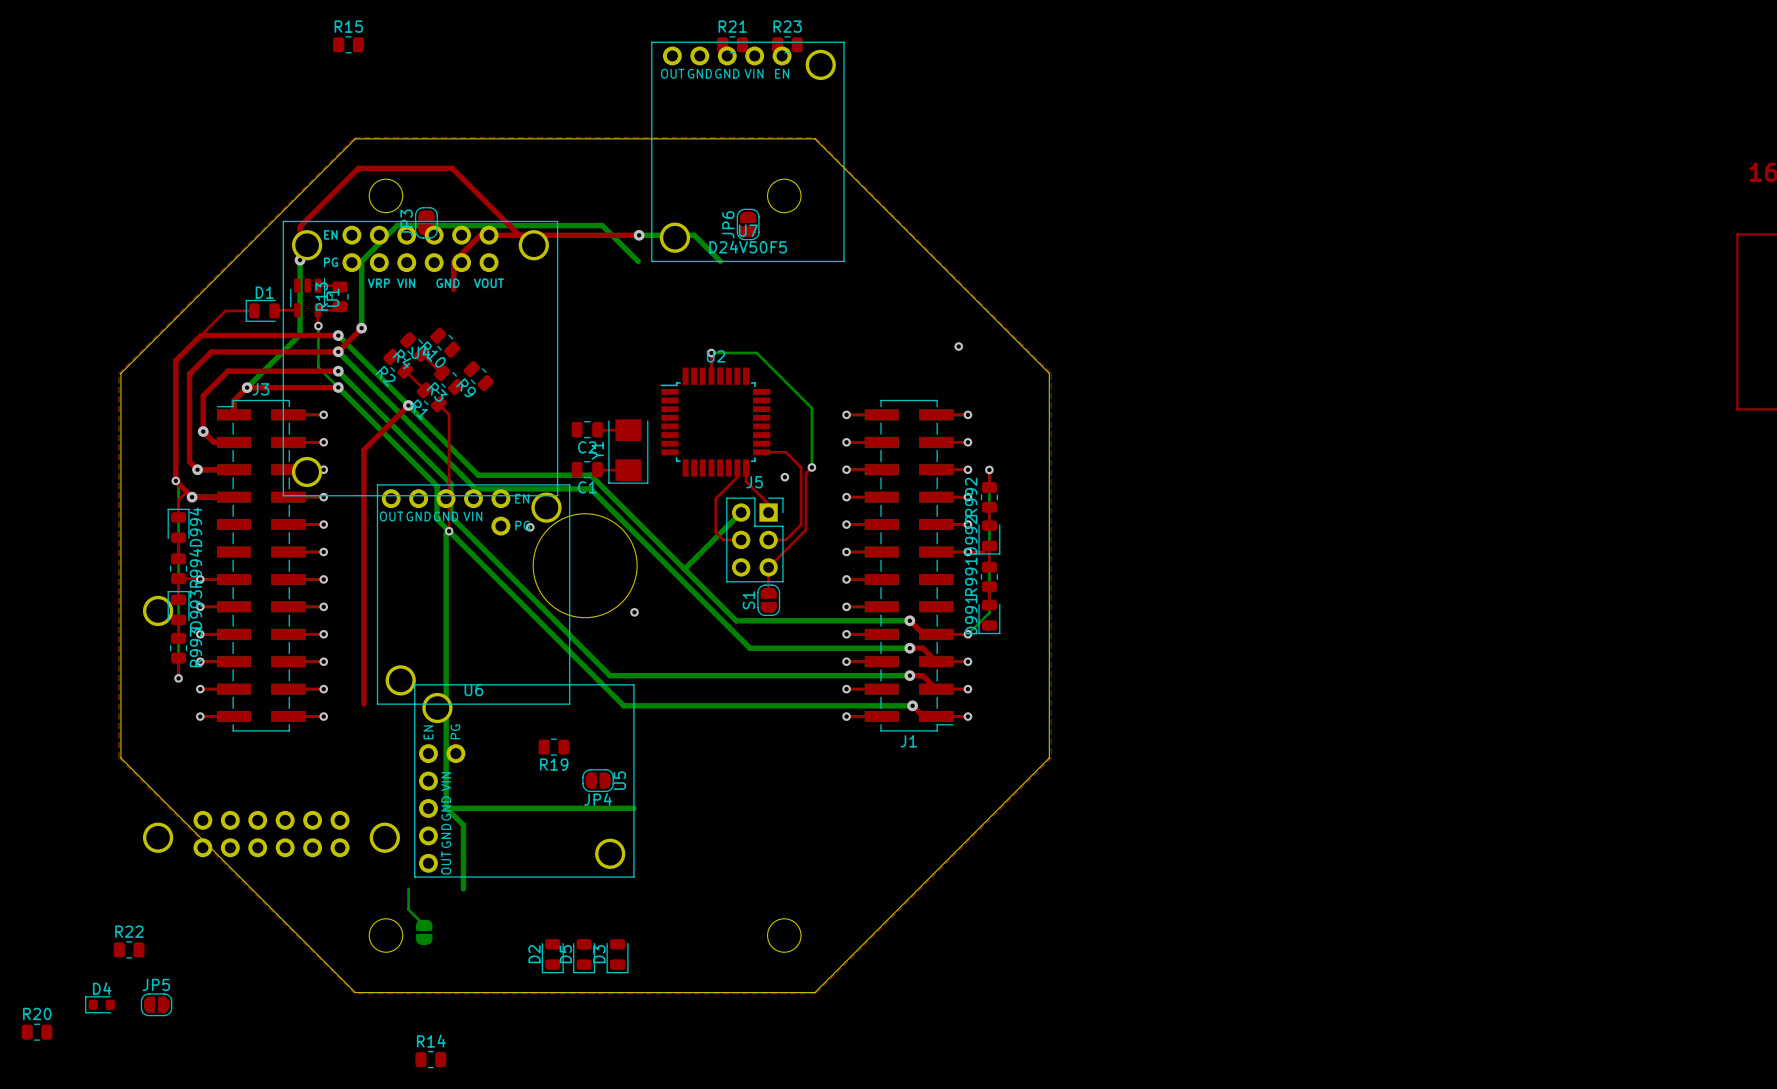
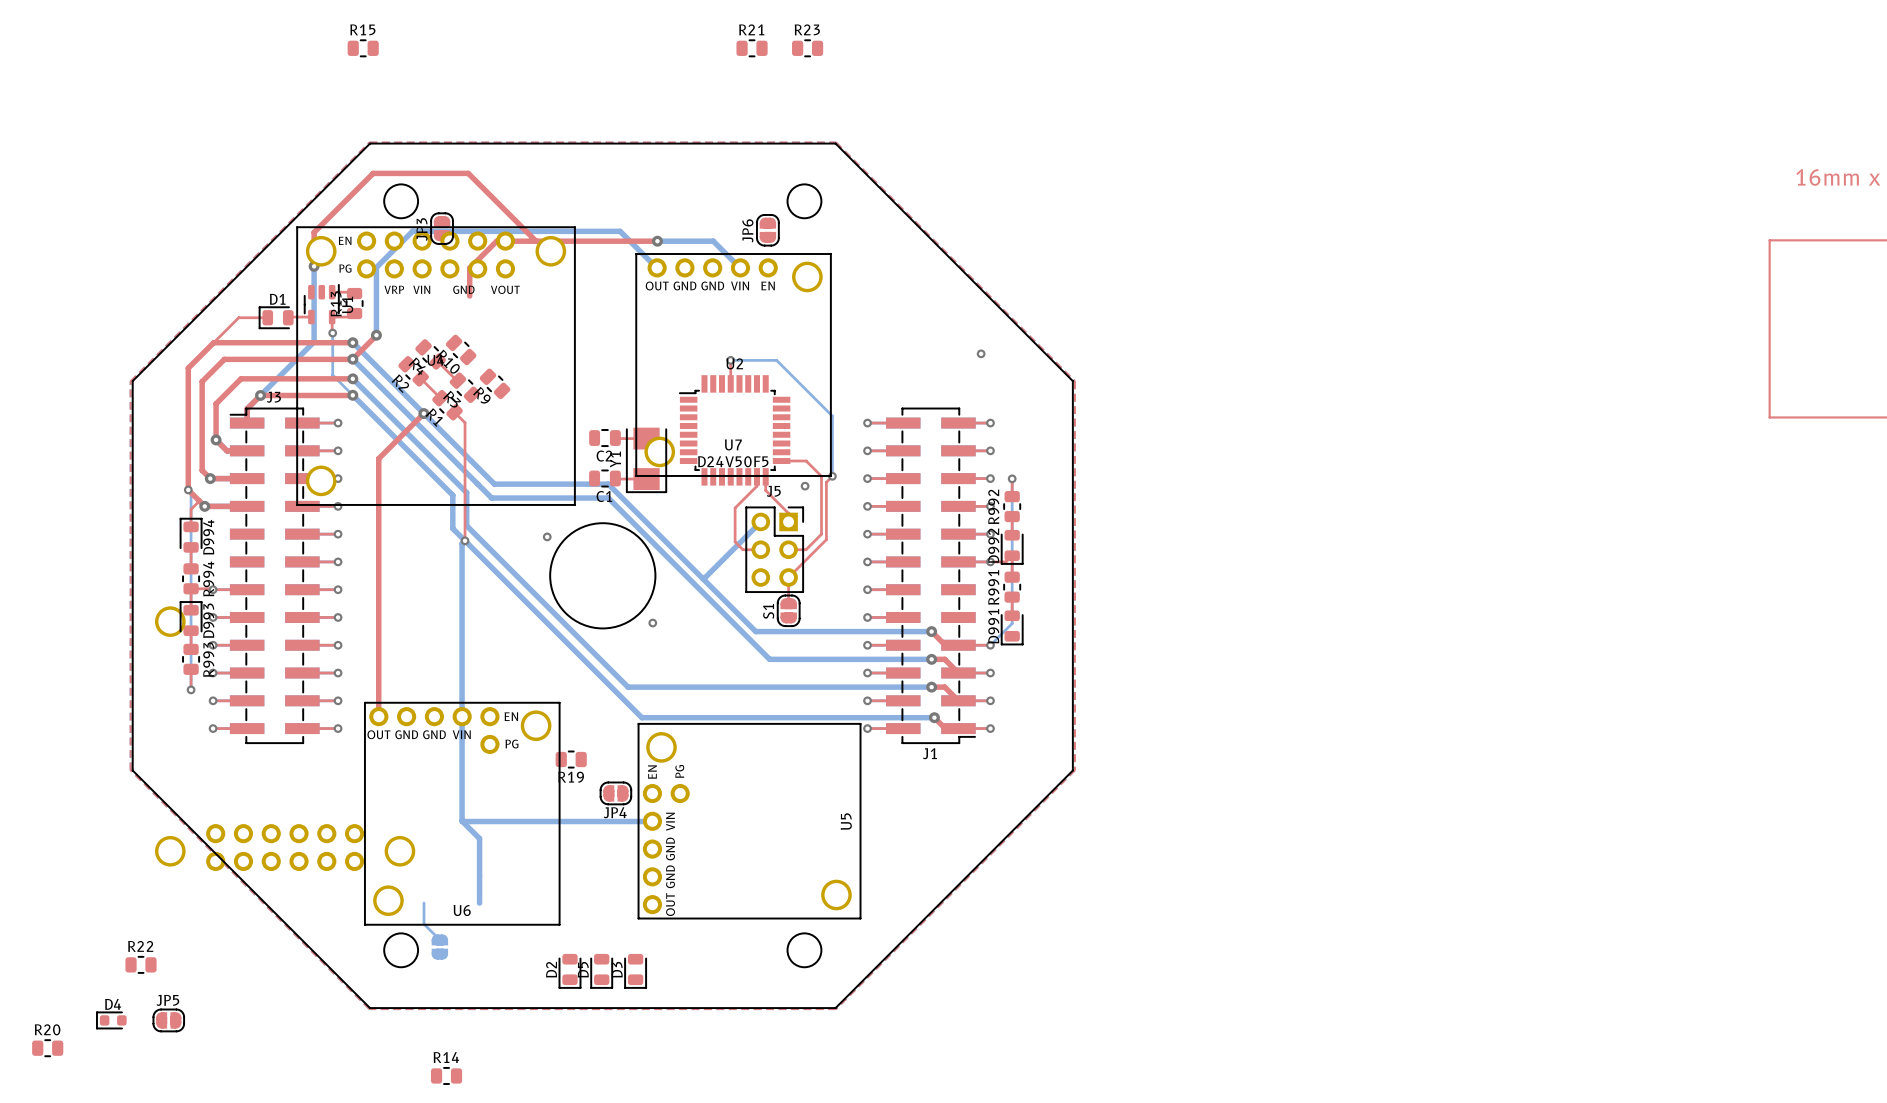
U7 position: (747, 151) -> (733, 364)
U6 position: (473, 594) -> (462, 813)
U5 position: (524, 780) -> (749, 821)

